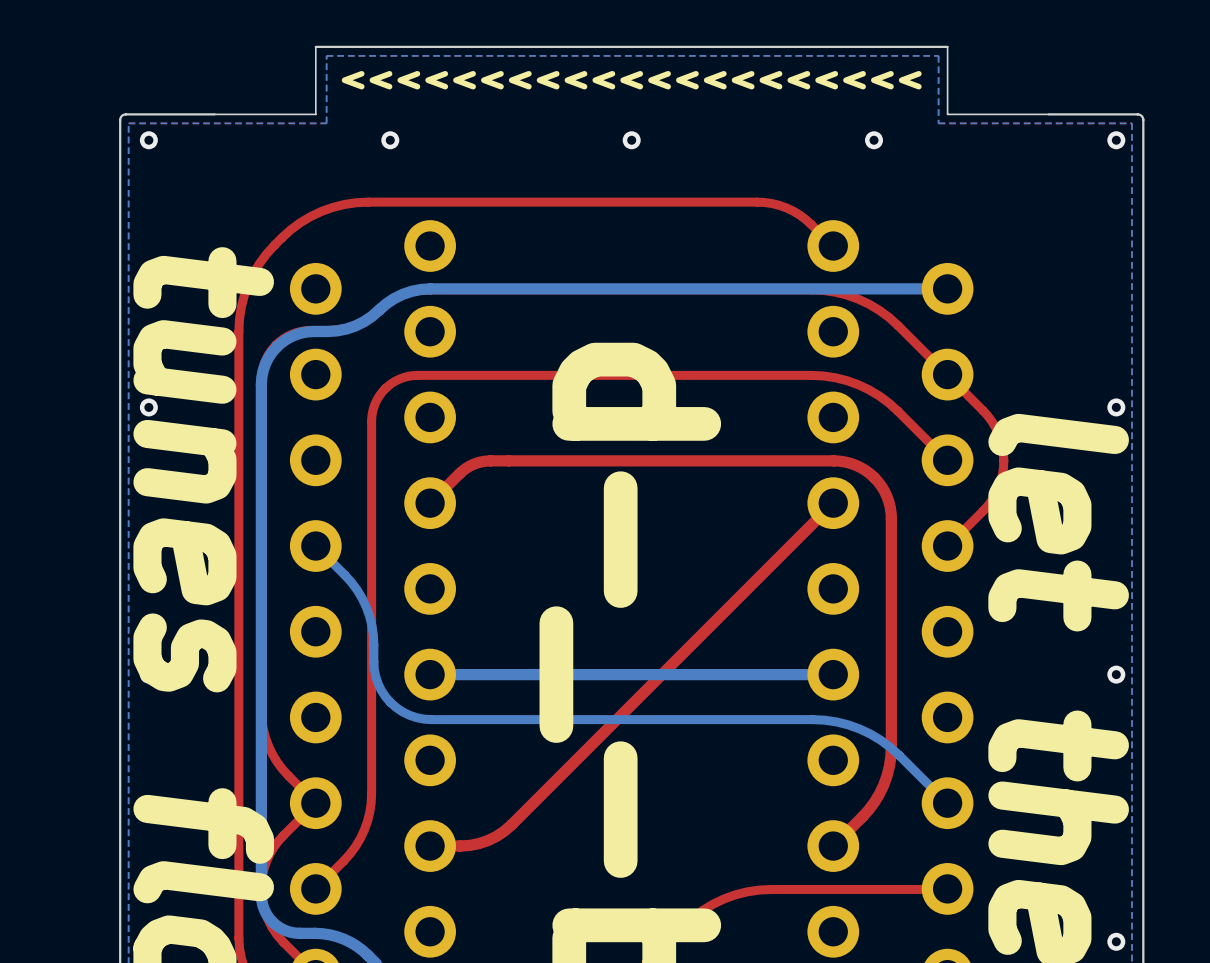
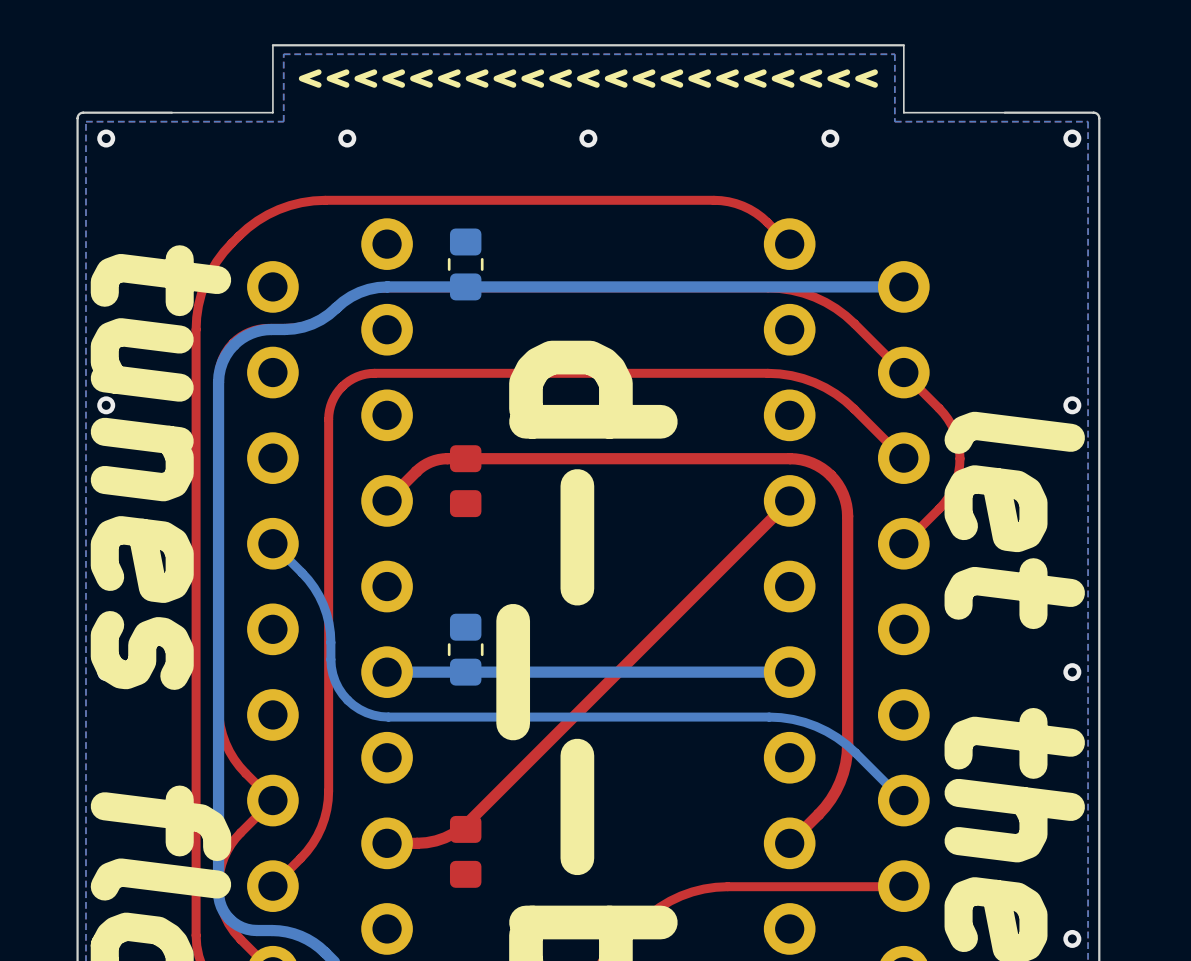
part: none -> (465, 264)
part: none -> (465, 481)
part: none -> (465, 649)
part: none -> (465, 851)

